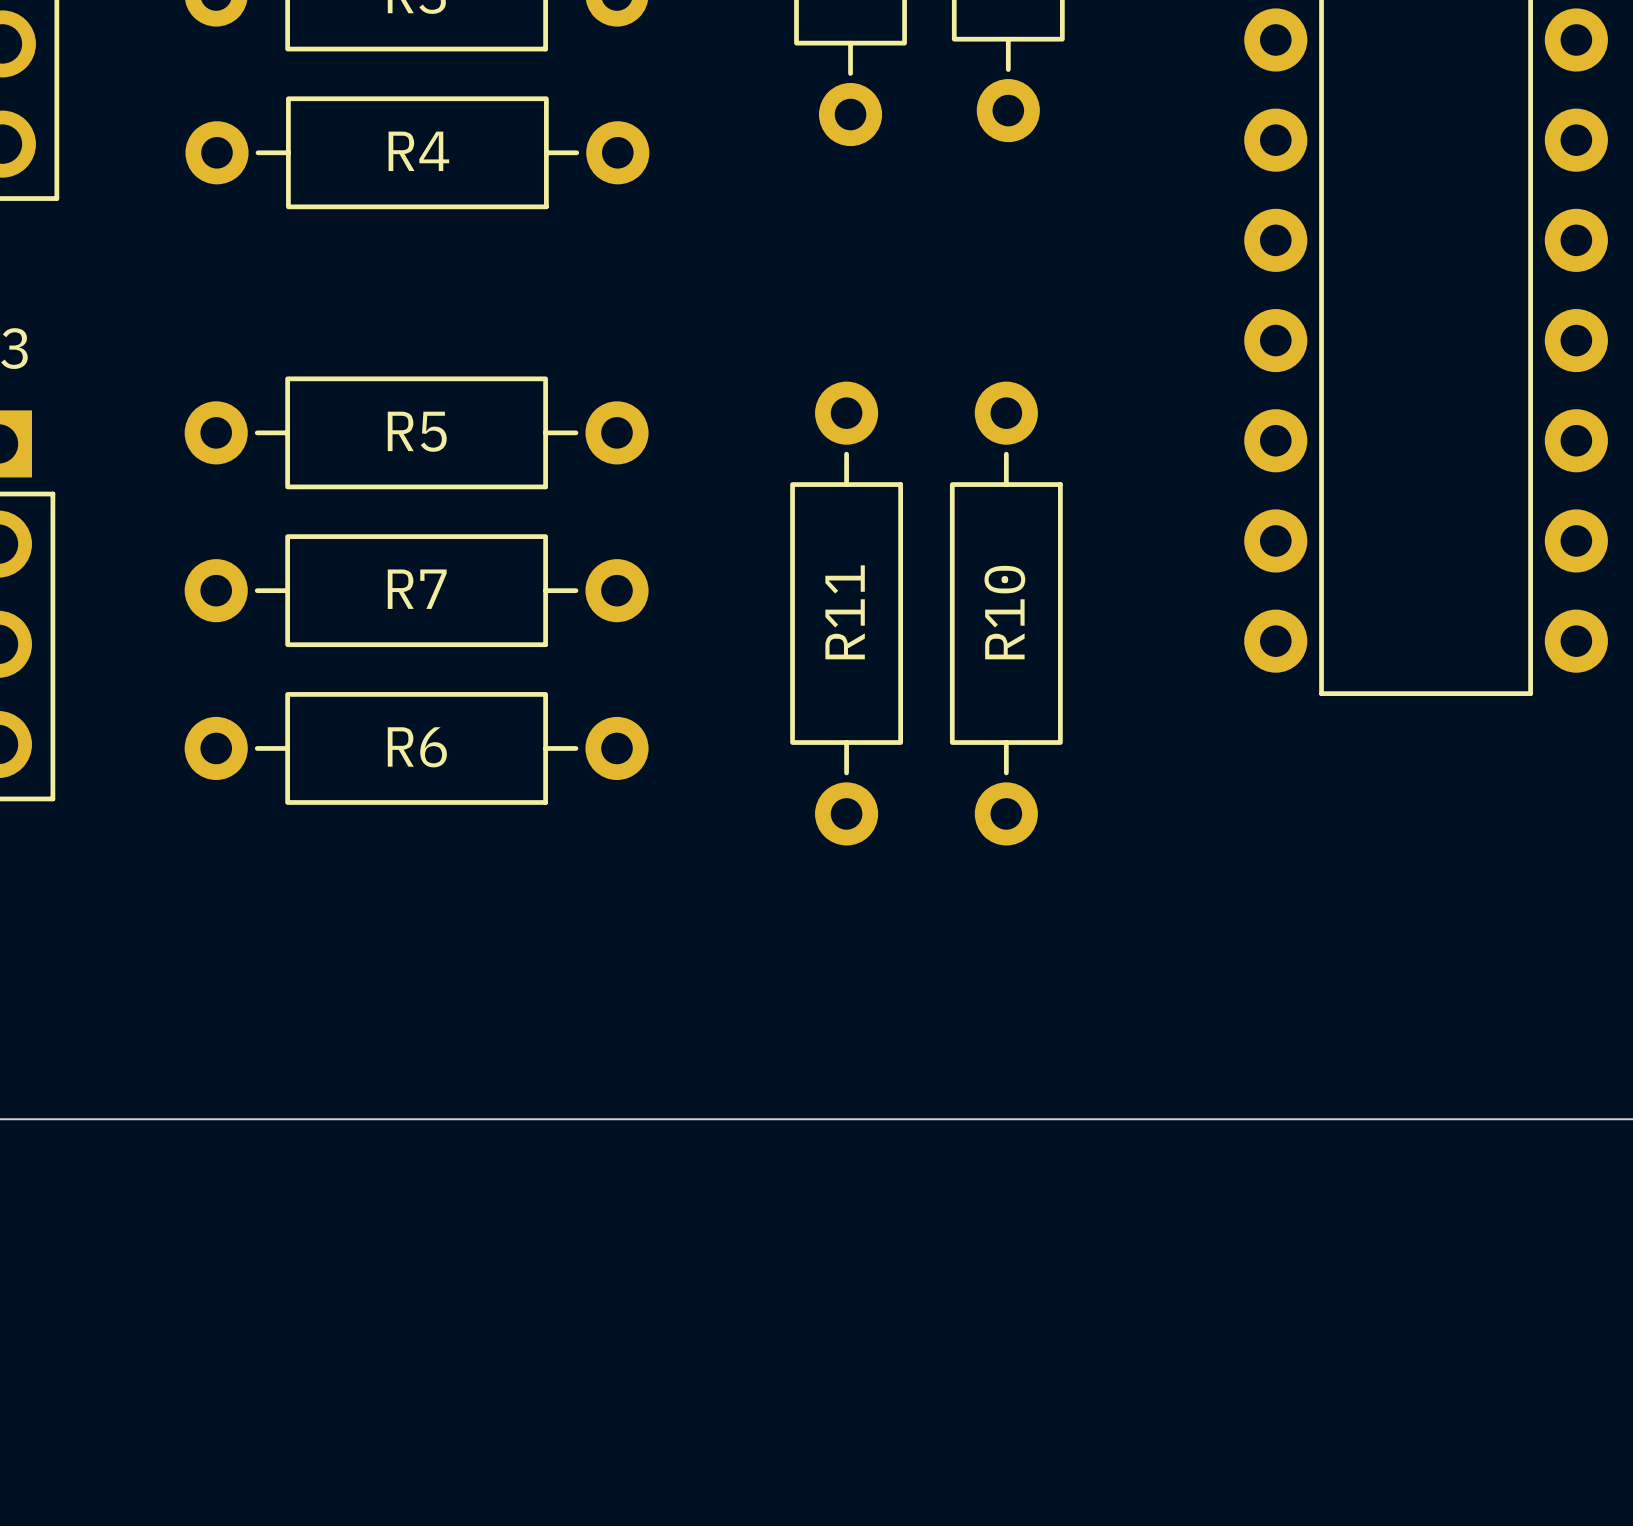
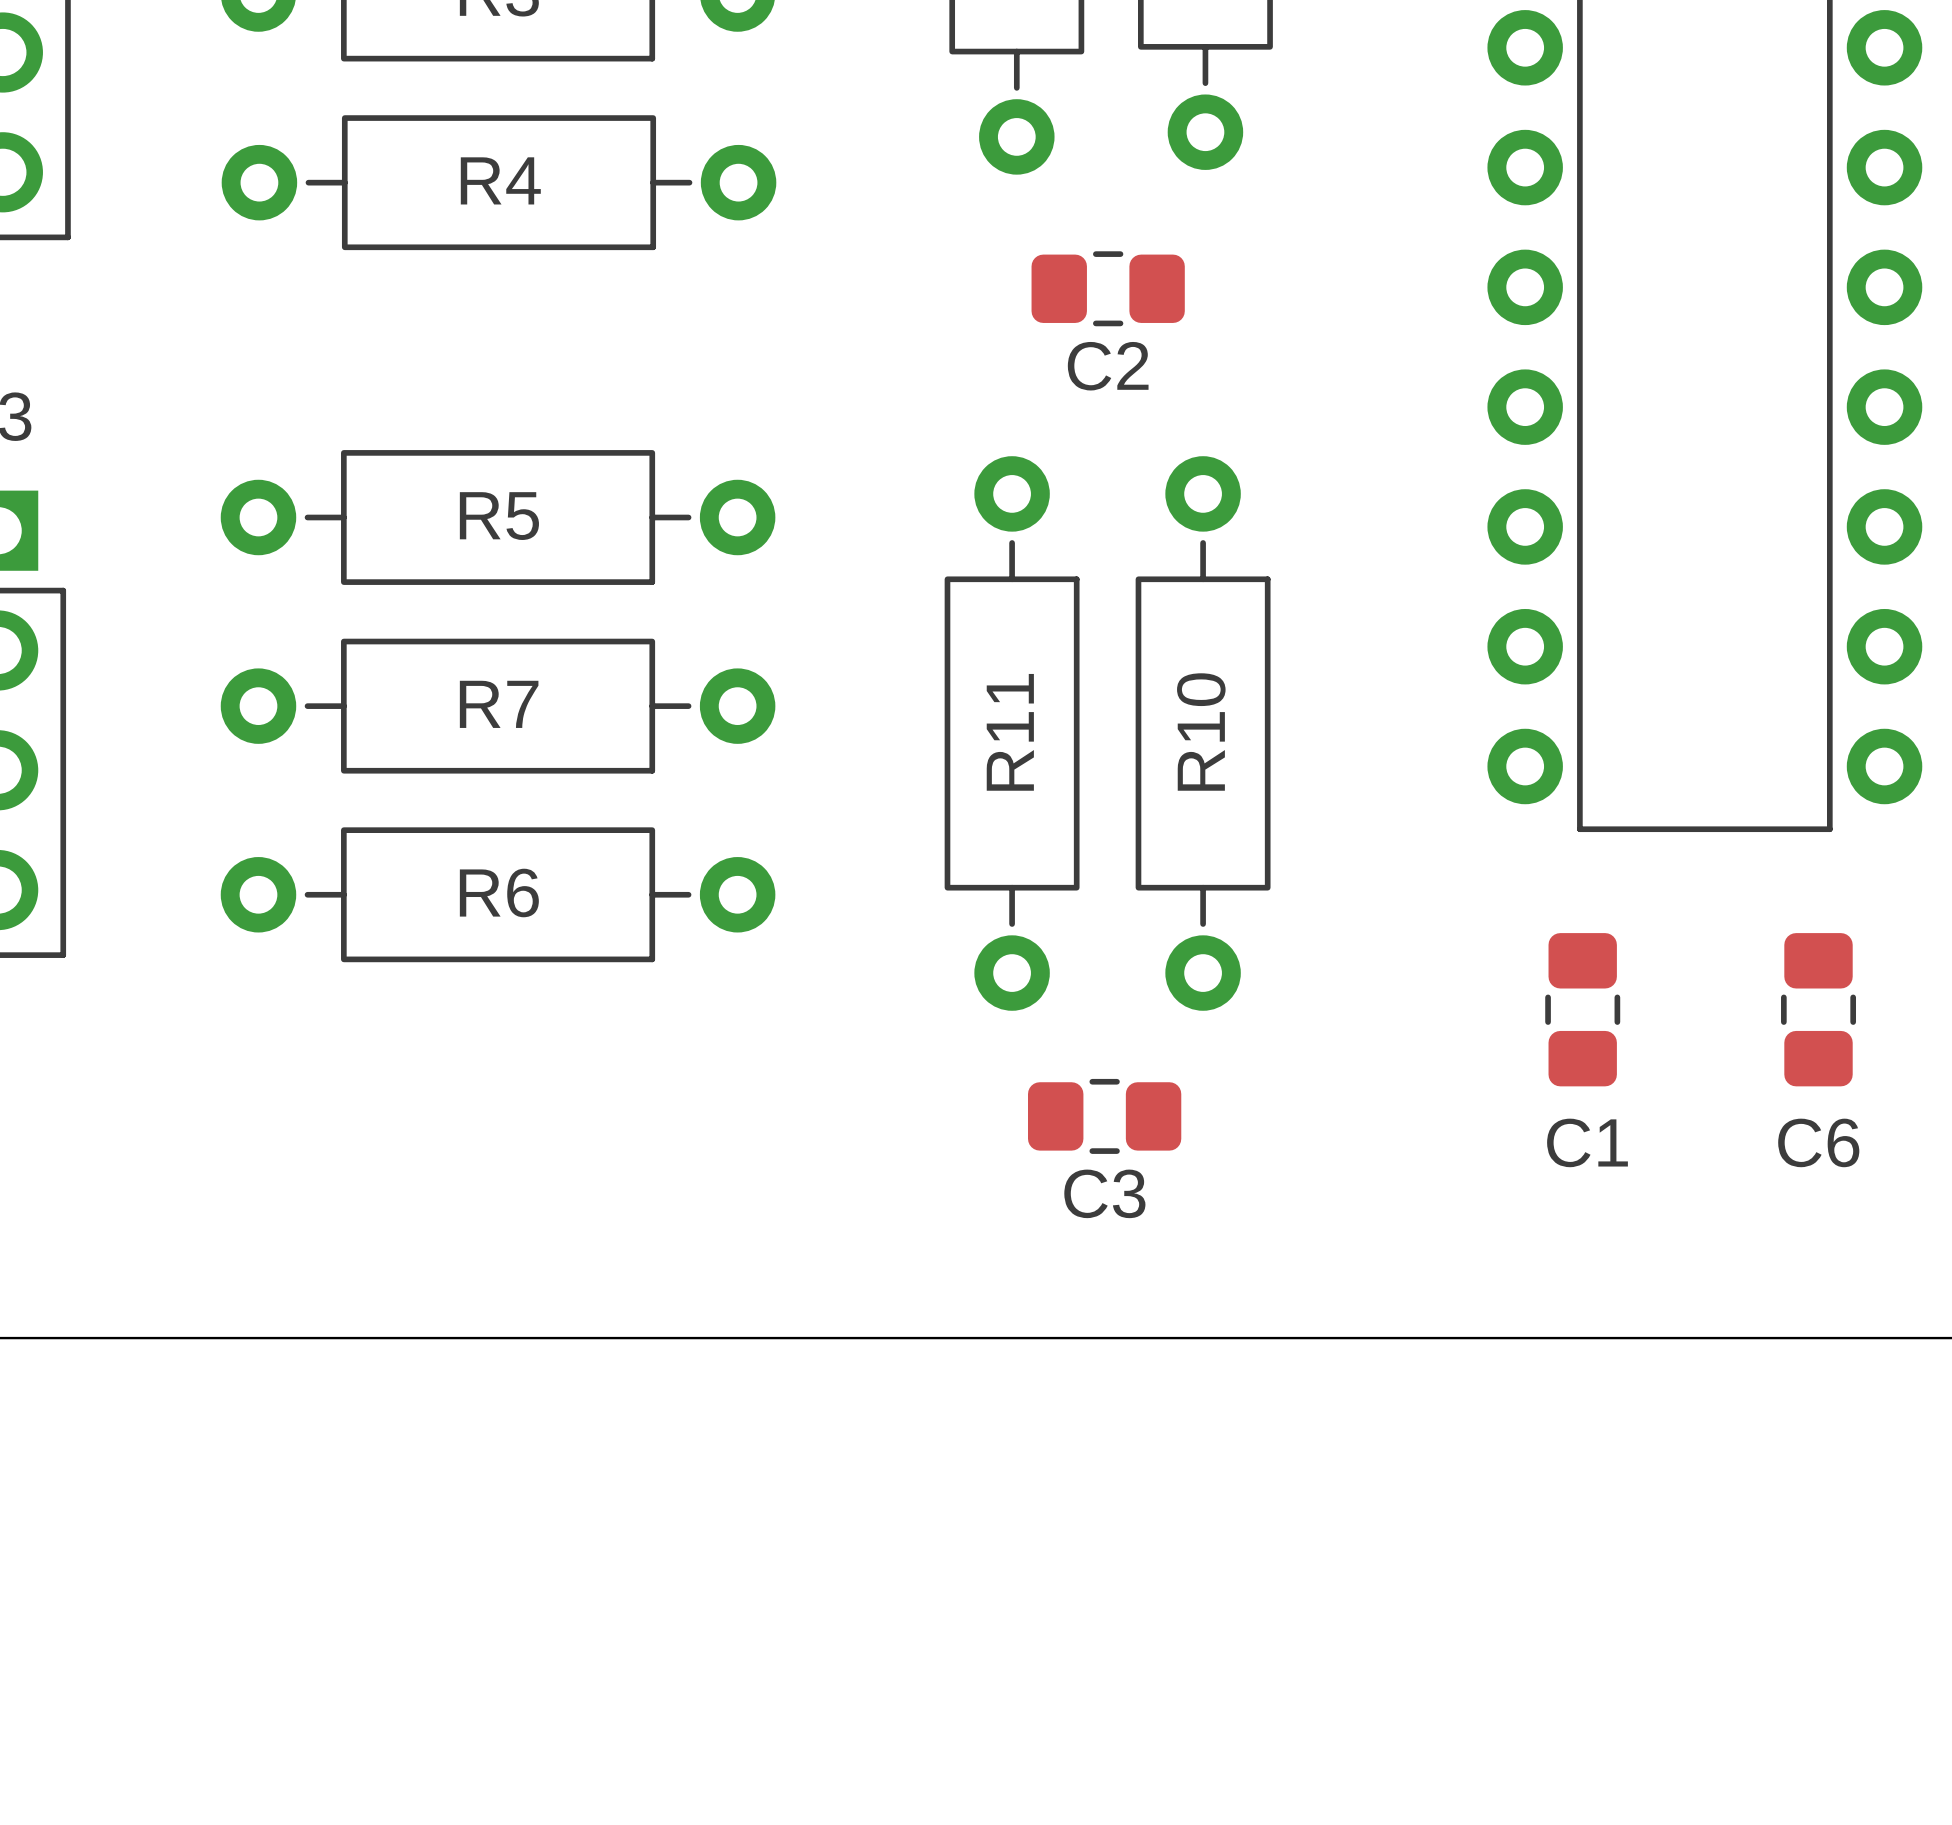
C2: none -> (1108, 288)
C1: none -> (1582, 1009)
C6: none -> (1818, 1009)
C3: none -> (1104, 1116)

